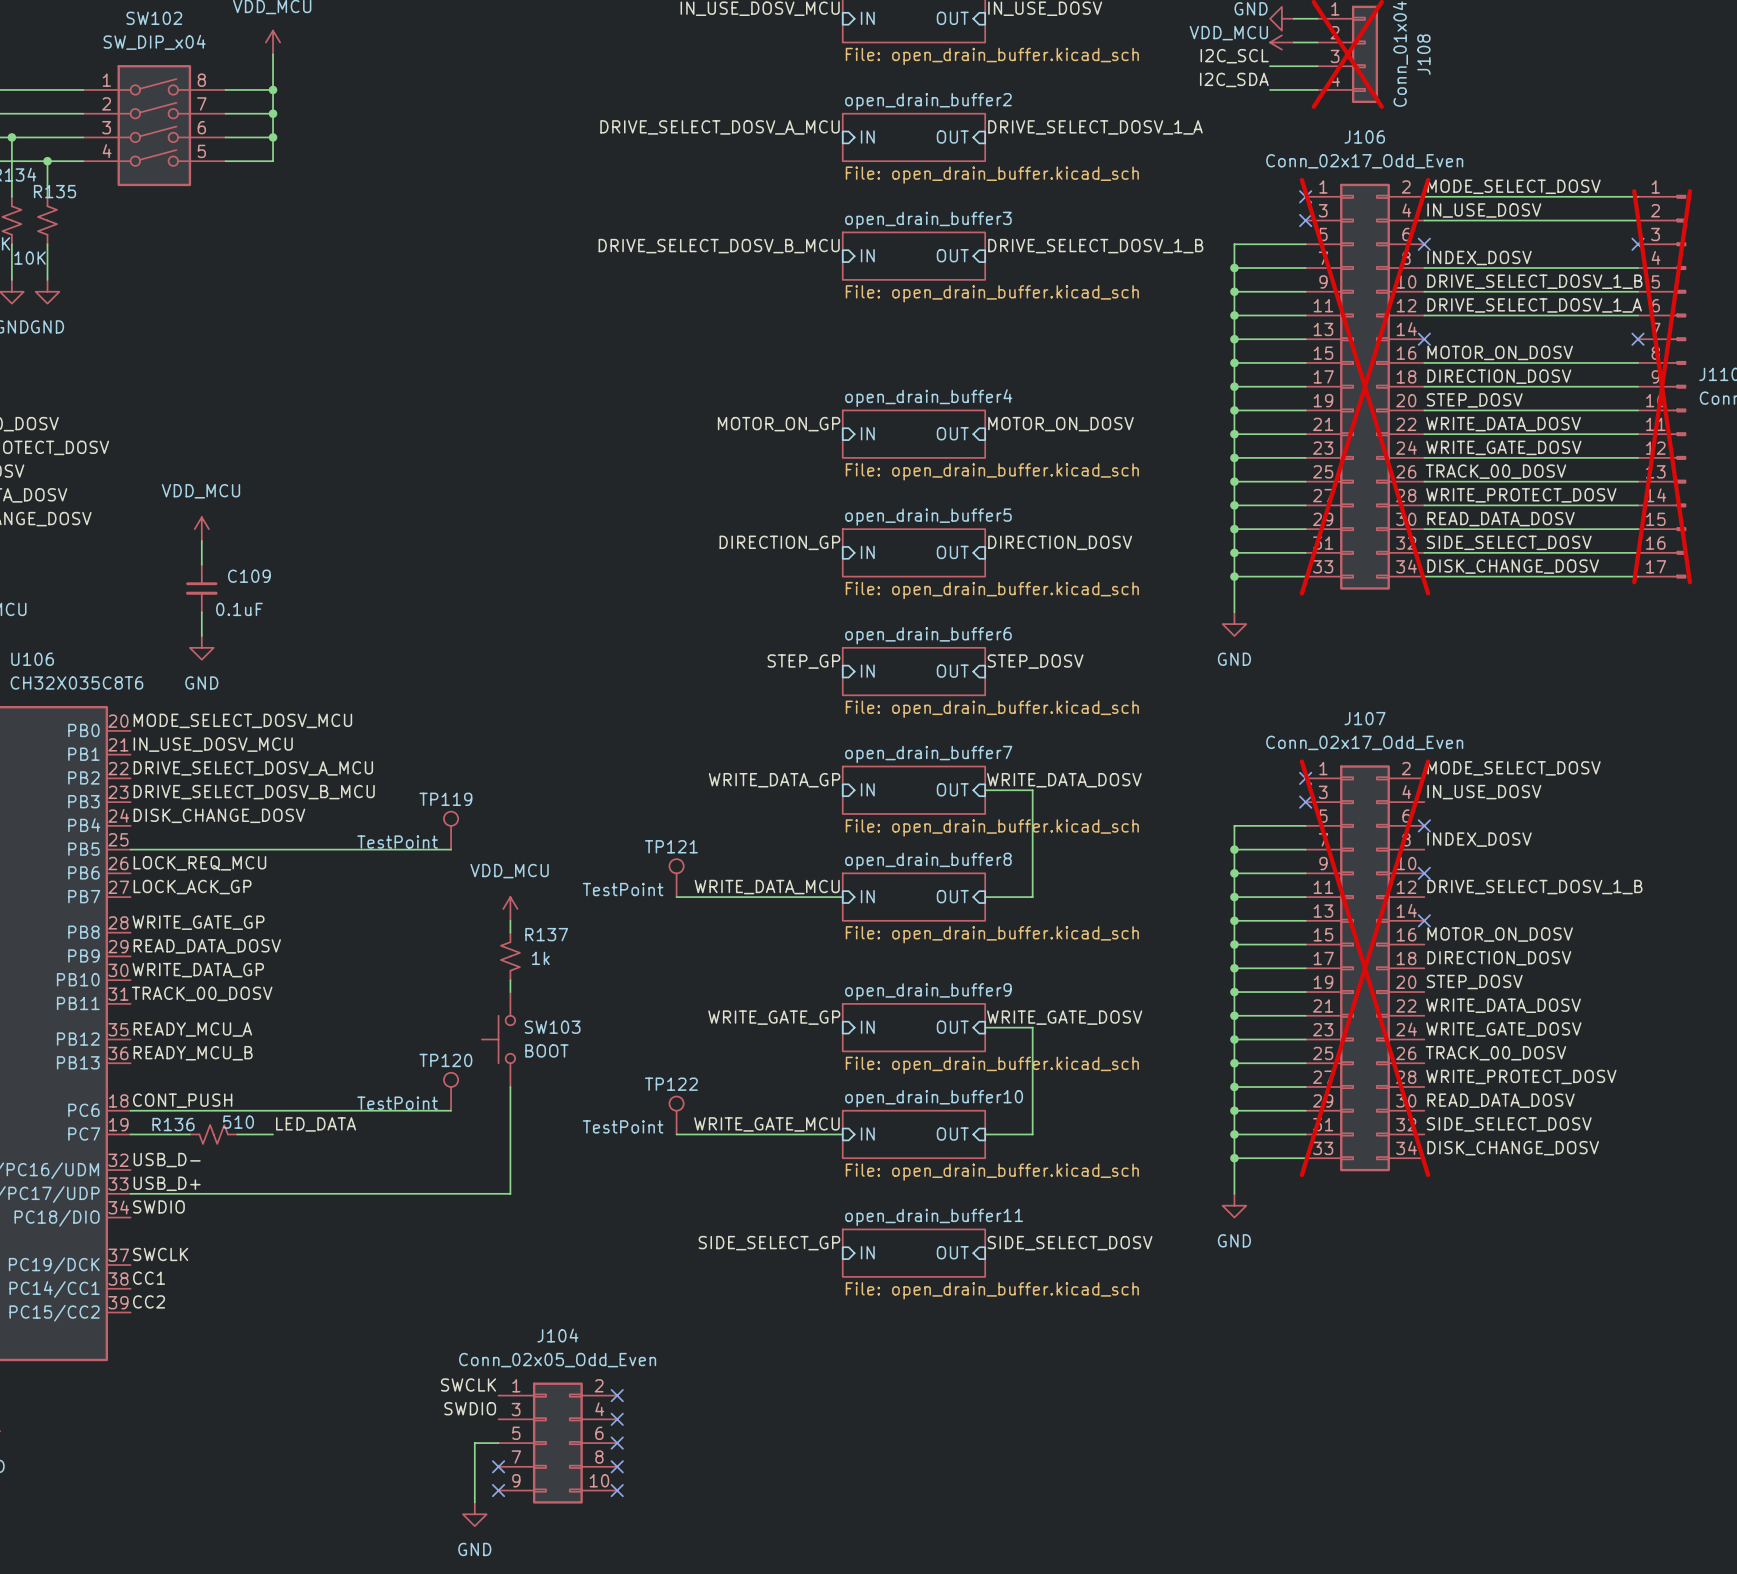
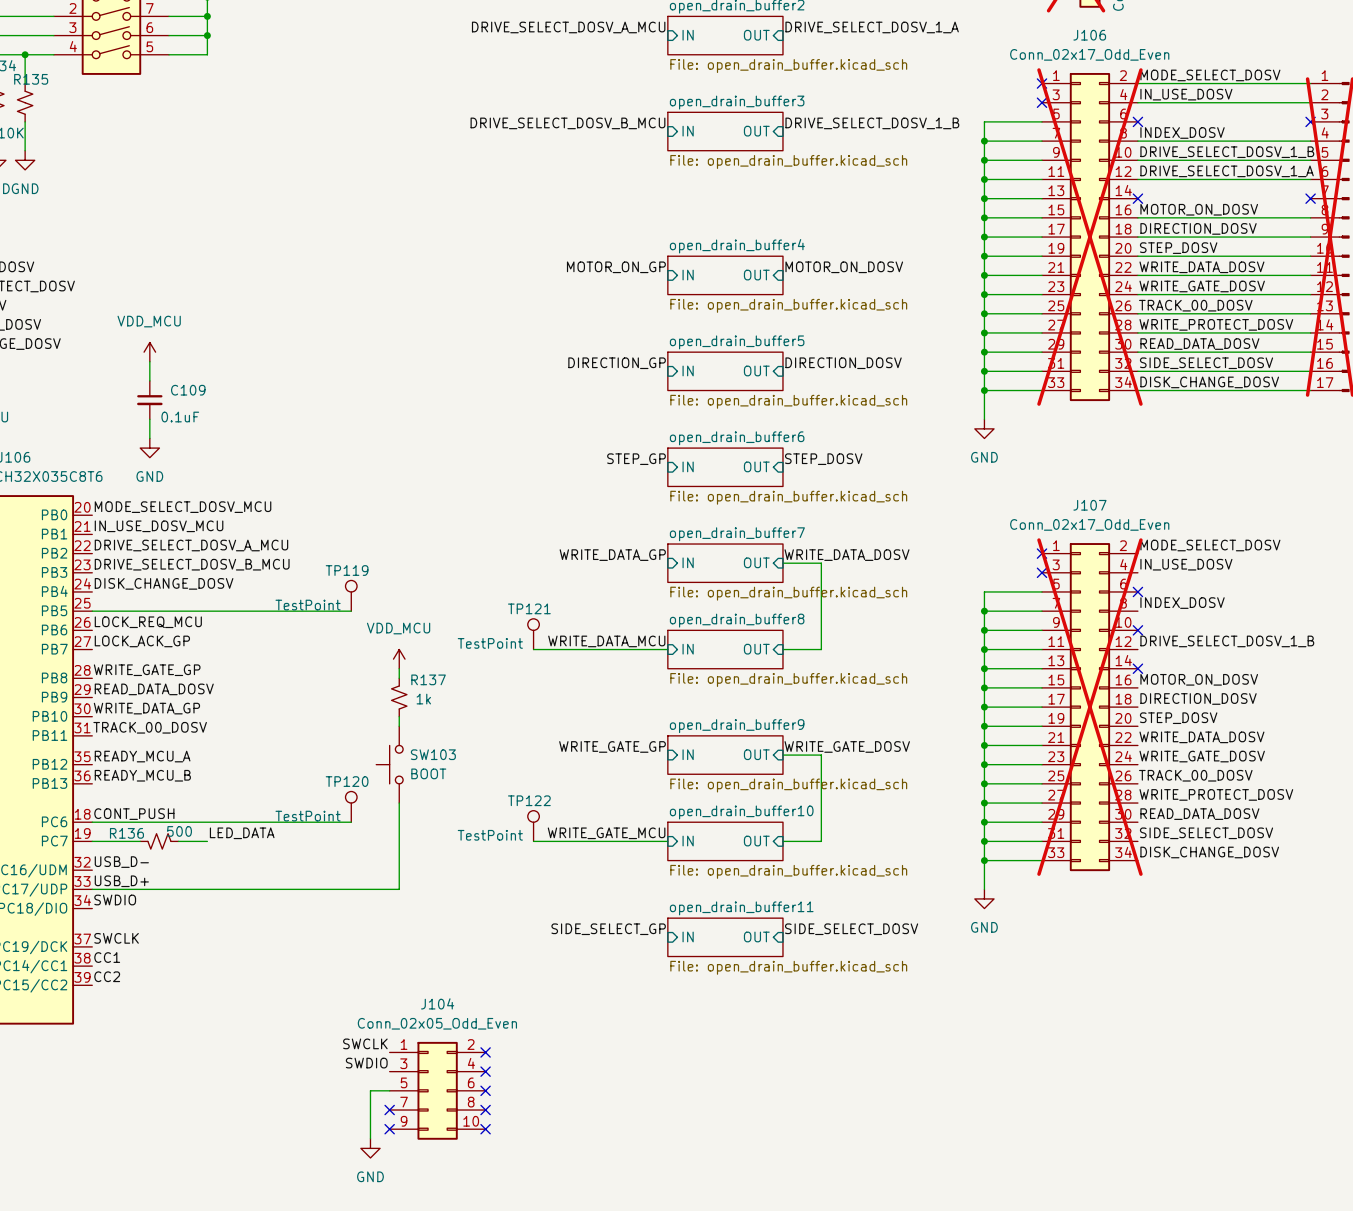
R136 value: 510 (238, 1122) -> 500 (179, 831)

